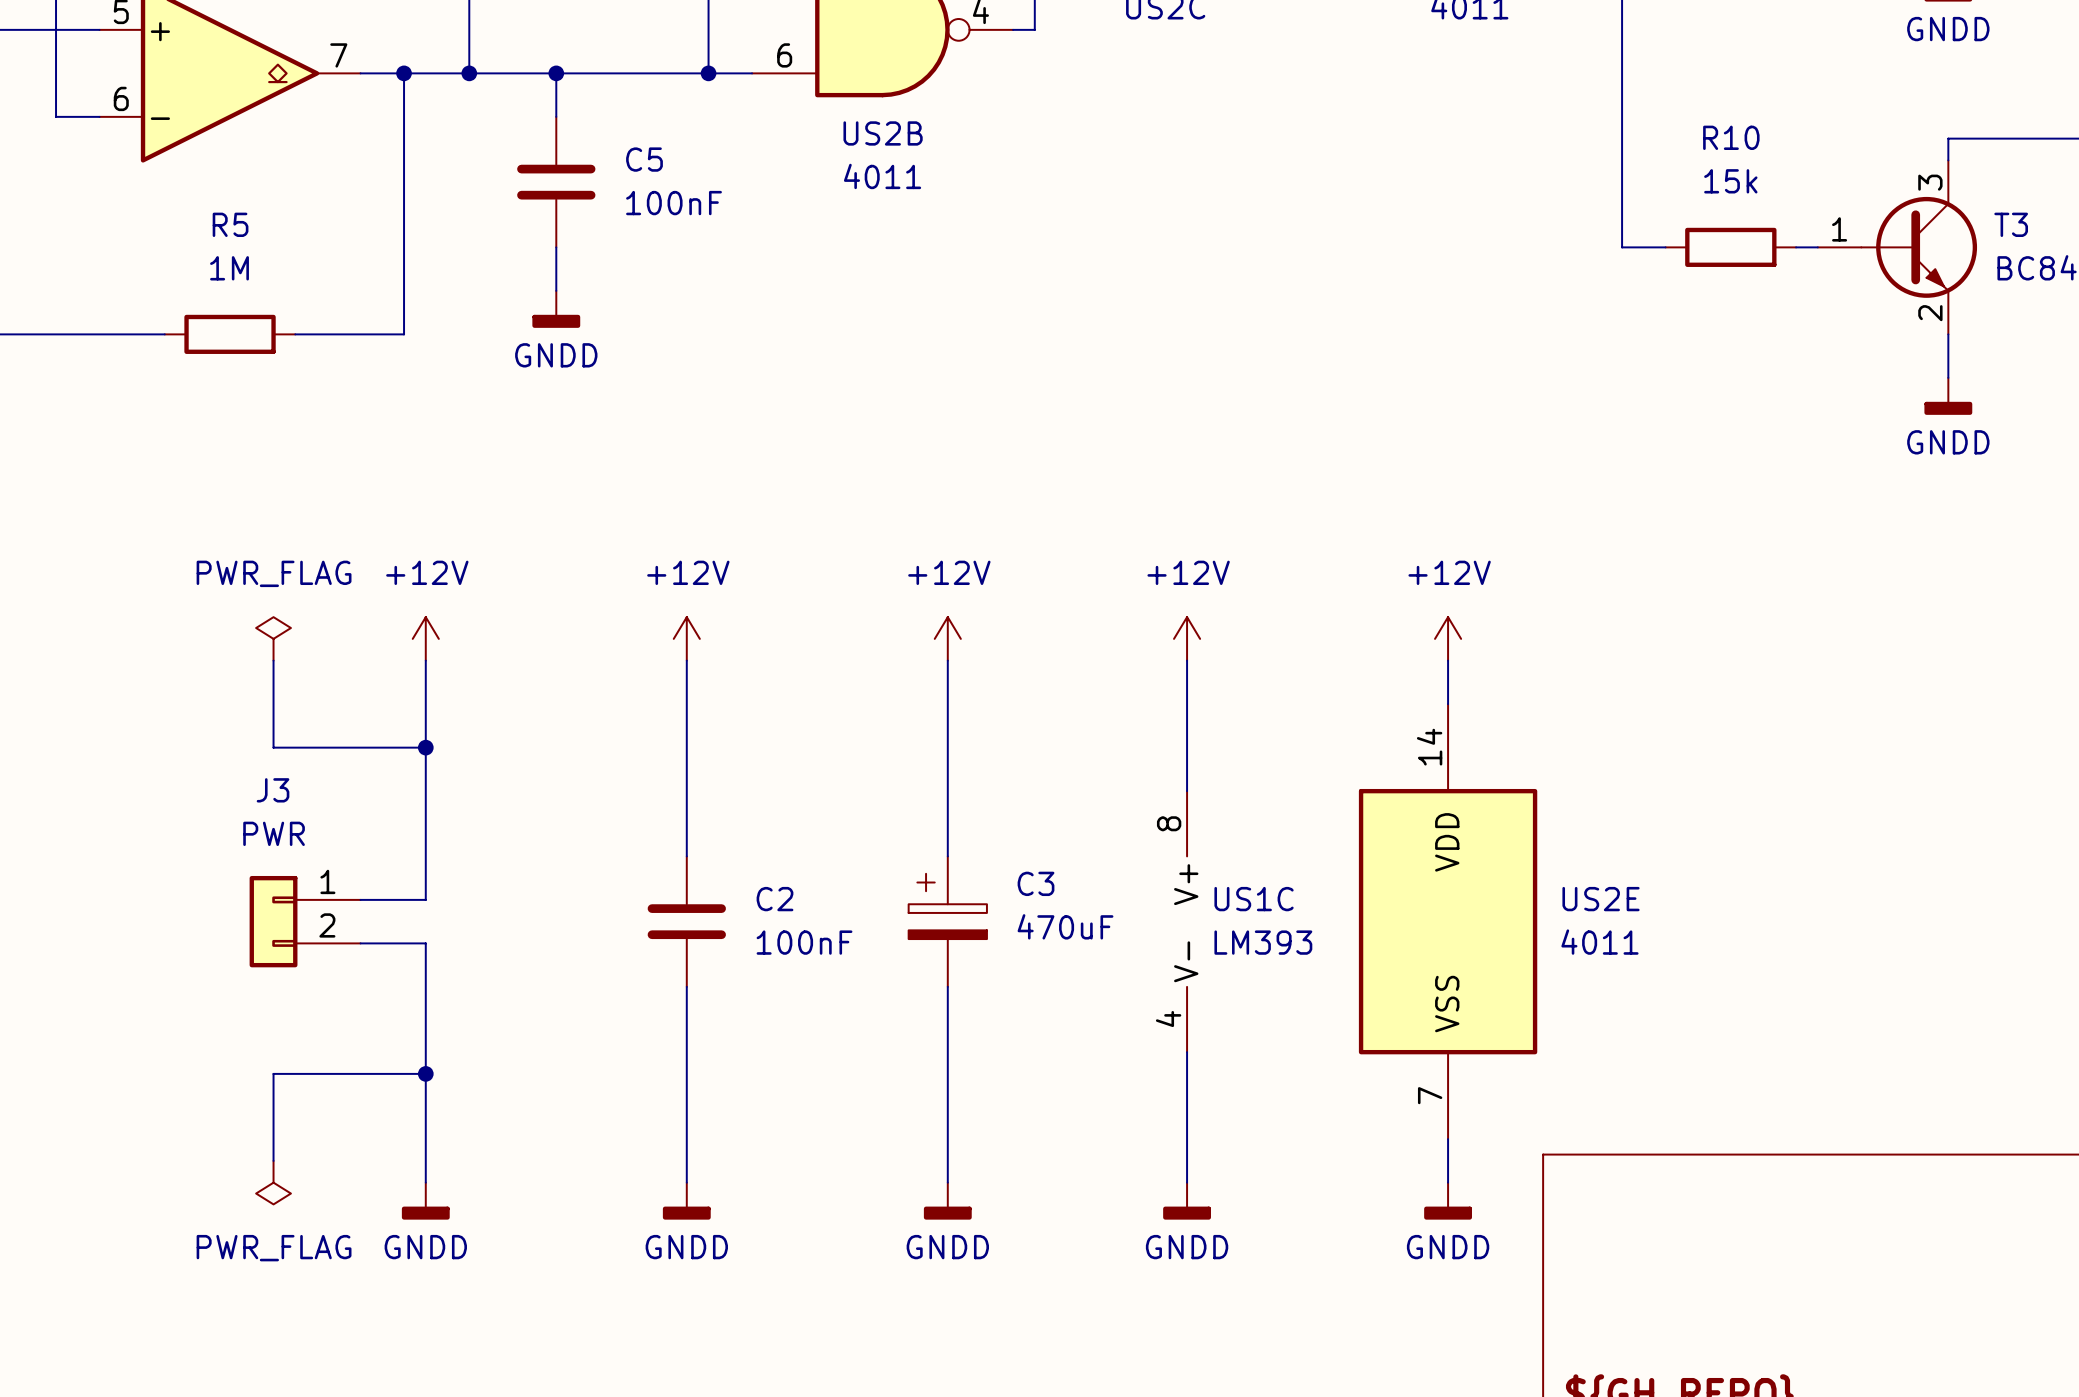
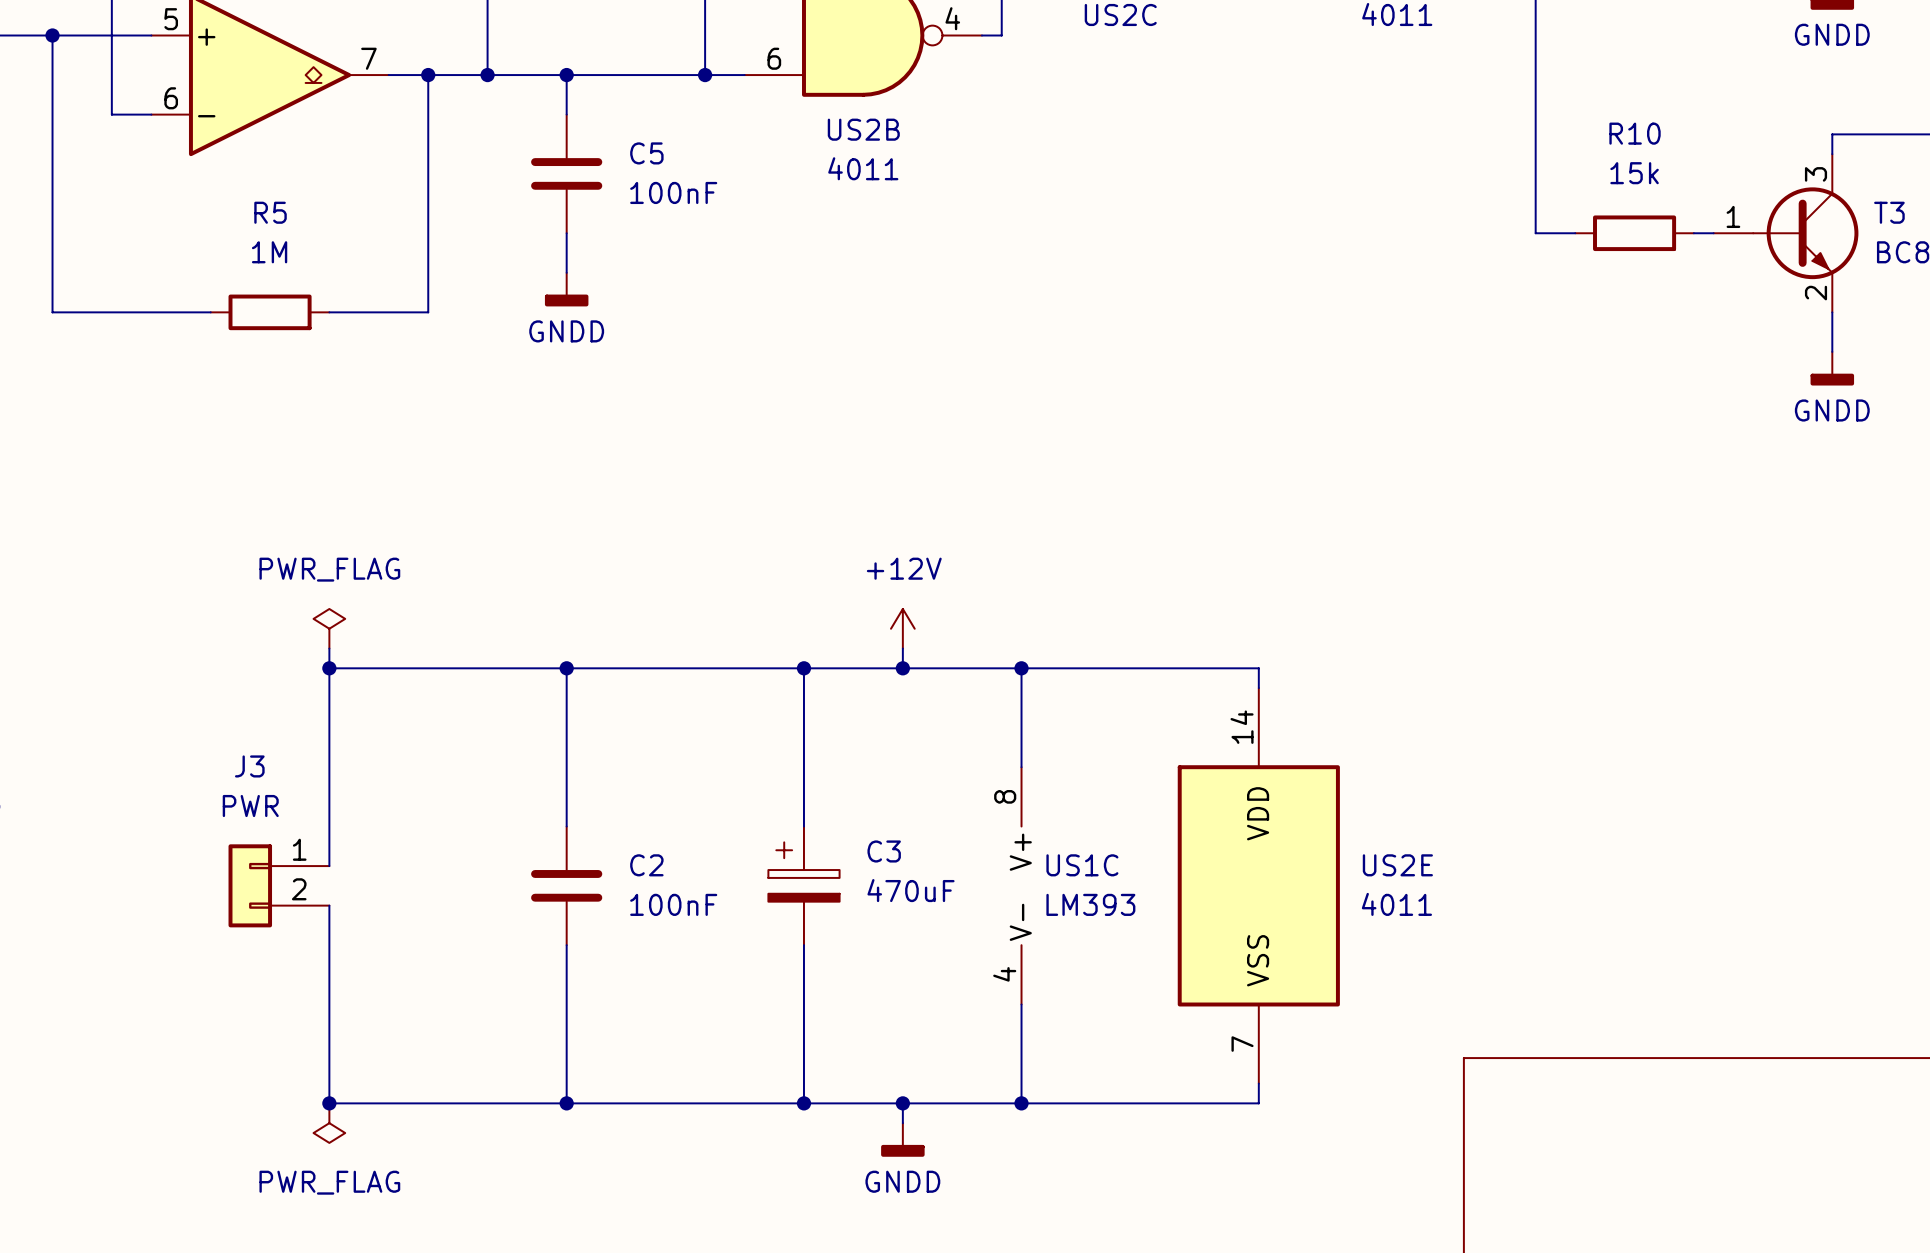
power symbol position: PWR_FLAG (273, 638) -> PWR_FLAG (329, 628)
power symbol: +12V (425, 638) -> none
power symbol: +12V (686, 638) -> none
power symbol position: +12V (947, 638) -> +12V (902, 628)
power symbol: +12V (1187, 638) -> none
power symbol: +12V (1448, 638) -> none
wire: (273, 660) (273, 747) (425, 747) -> none
wire: (425, 660) (425, 899) (360, 899) -> none
wire: (686, 660) (686, 856) -> none
wire: (947, 660) (947, 856) -> none
wire: (1187, 660) (1187, 791) -> none
wire: (1448, 660) (1448, 704) -> none
wire: none -> (329, 648) (329, 866)
wire: none -> (902, 648) (902, 668)
wire: none -> (329, 668) (1258, 668) (1258, 688)
junction: none -> (329, 668)
wire: none -> (566, 668) (566, 826)
junction: none -> (566, 668)
wire: none -> (803, 668) (803, 826)
junction: none -> (803, 668)
junction: none -> (902, 668)
wire: none -> (1021, 668) (1021, 767)
junction: none -> (1021, 668)
junction: (425, 747) -> none
J3 position: (305, 921) -> (278, 885)
C2 position: (686, 921) -> (566, 885)
C3 position: (947, 921) -> (803, 885)
US1C position: (1187, 921) -> (1021, 885)
US2E position: (1448, 921) -> (1258, 885)
wire: (360, 943) (425, 943) (425, 1182) -> none
wire: none -> (329, 905) (329, 1103) (1258, 1103) (1258, 1083)
wire: (686, 986) (686, 1182) -> none
wire: (947, 986) (947, 1182) -> none
wire: none -> (566, 945) (566, 1103)
wire: none -> (803, 945) (803, 1103)
wire: (1187, 1052) (1187, 1182) -> none
wire: (425, 1073) (273, 1073) (273, 1160) -> none
junction: (425, 1073) -> none
wire: none -> (1021, 1004) (1021, 1103)
wire: (1448, 1139) (1448, 1182) -> none
power symbol position: PWR_FLAG (273, 1182) -> PWR_FLAG (329, 1123)
power symbol: GNDD (425, 1201) -> none
power symbol: GNDD (686, 1201) -> none
power symbol position: GNDD (947, 1201) -> GNDD (902, 1139)
power symbol: GNDD (1187, 1201) -> none
power symbol: GNDD (1448, 1201) -> none
junction: none -> (329, 1103)
junction: none -> (566, 1103)
junction: none -> (803, 1103)
junction: none -> (902, 1103)
junction: none -> (1021, 1103)

